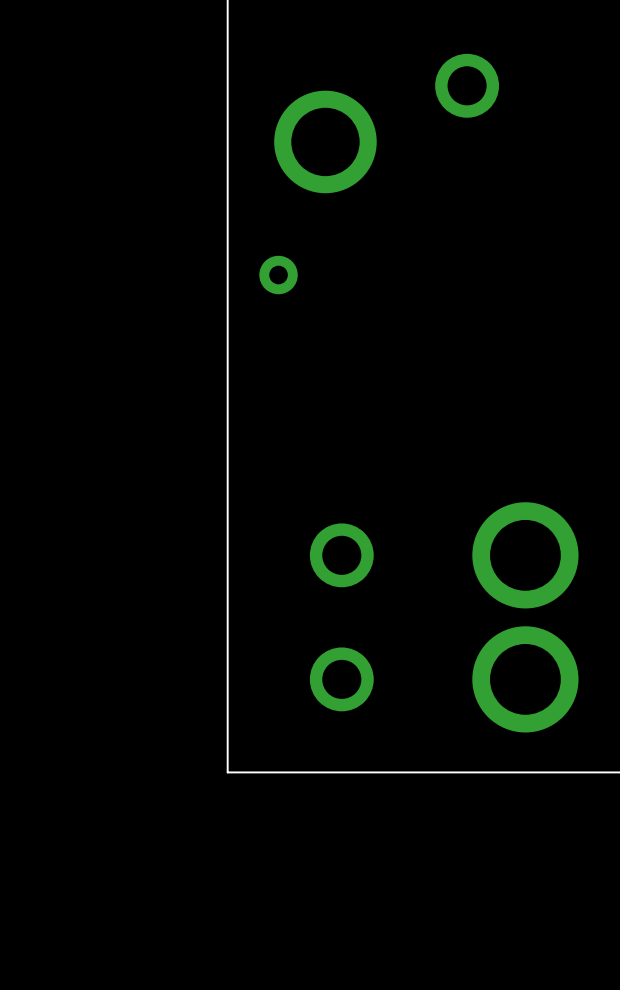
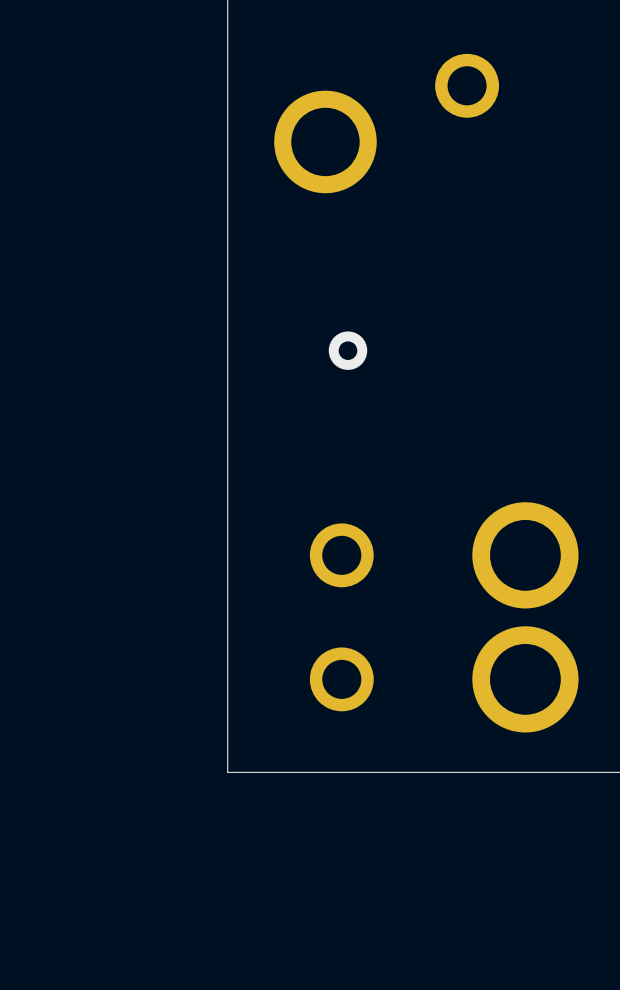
via position: (278, 275) -> (348, 350)

